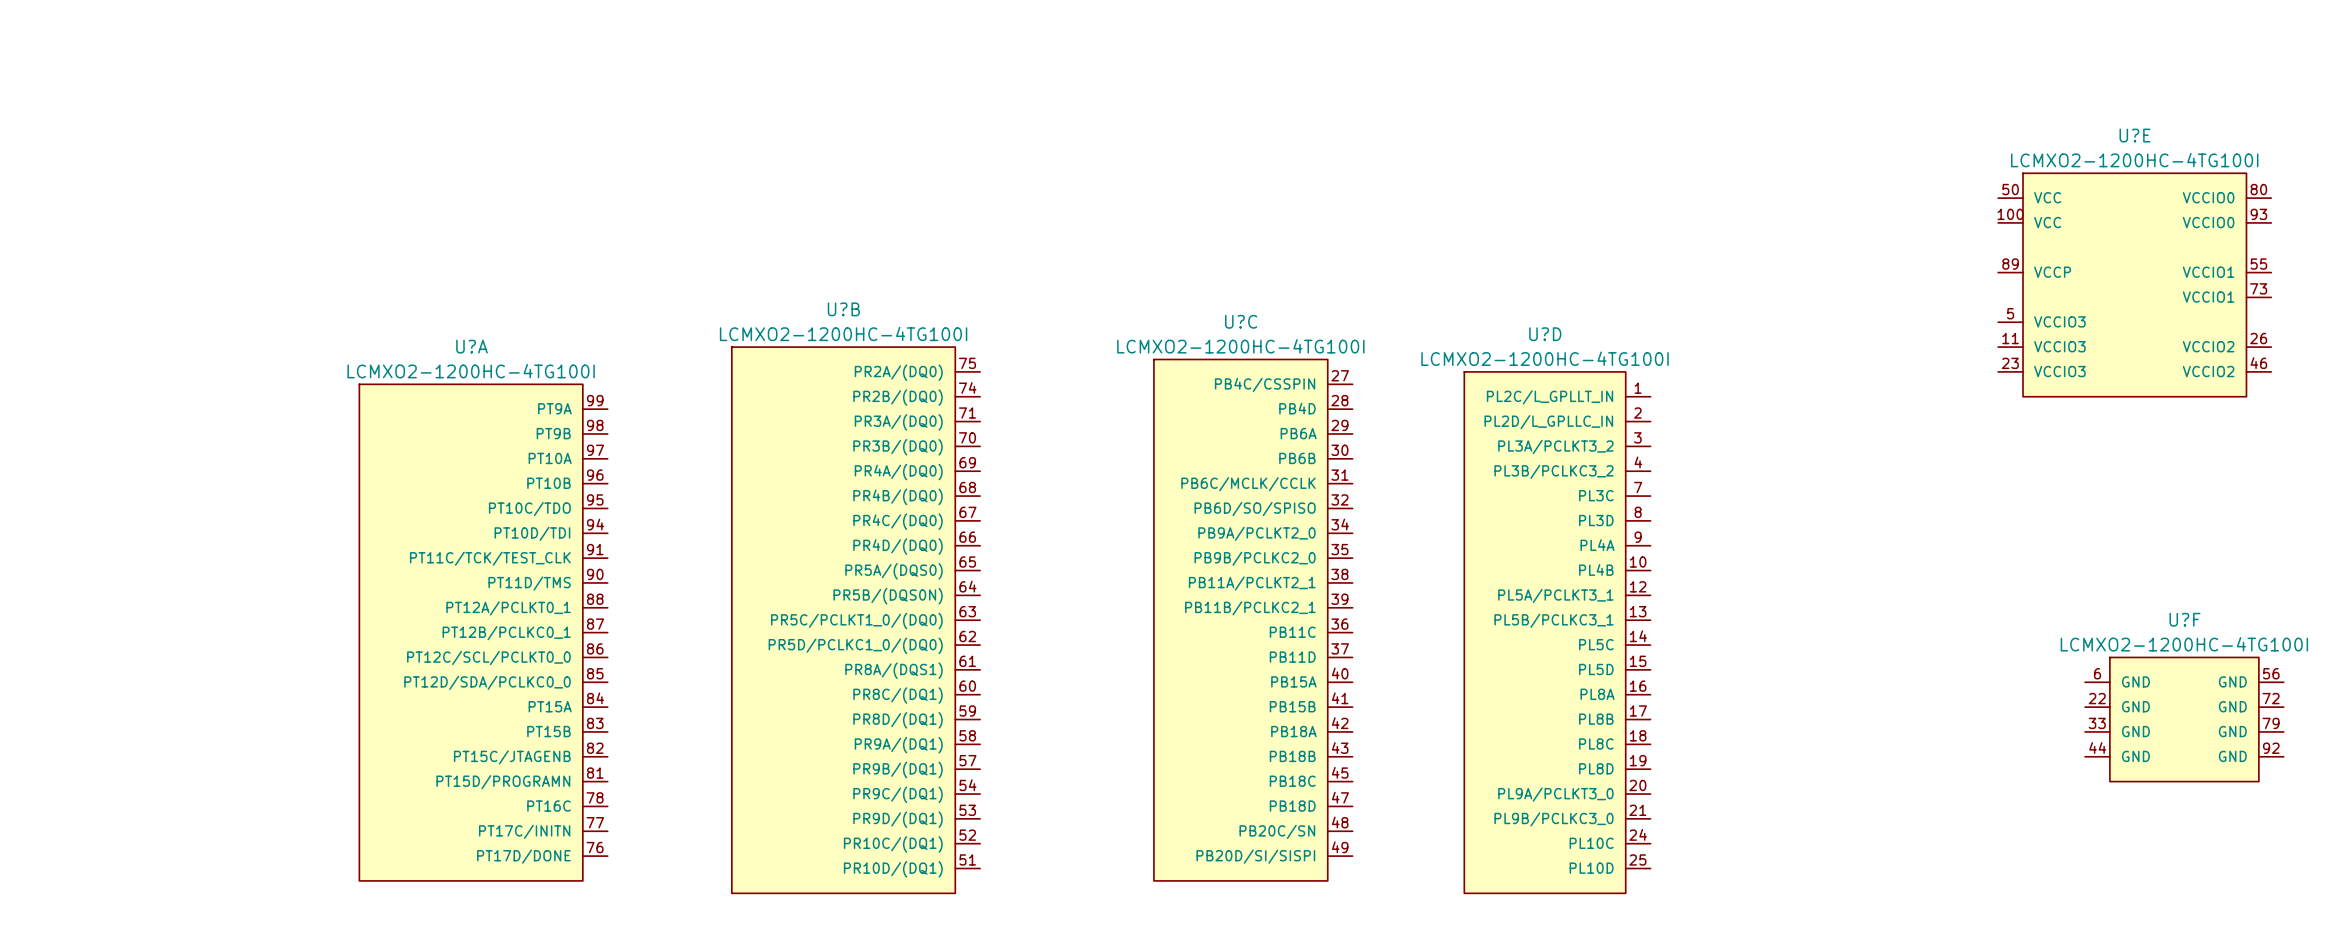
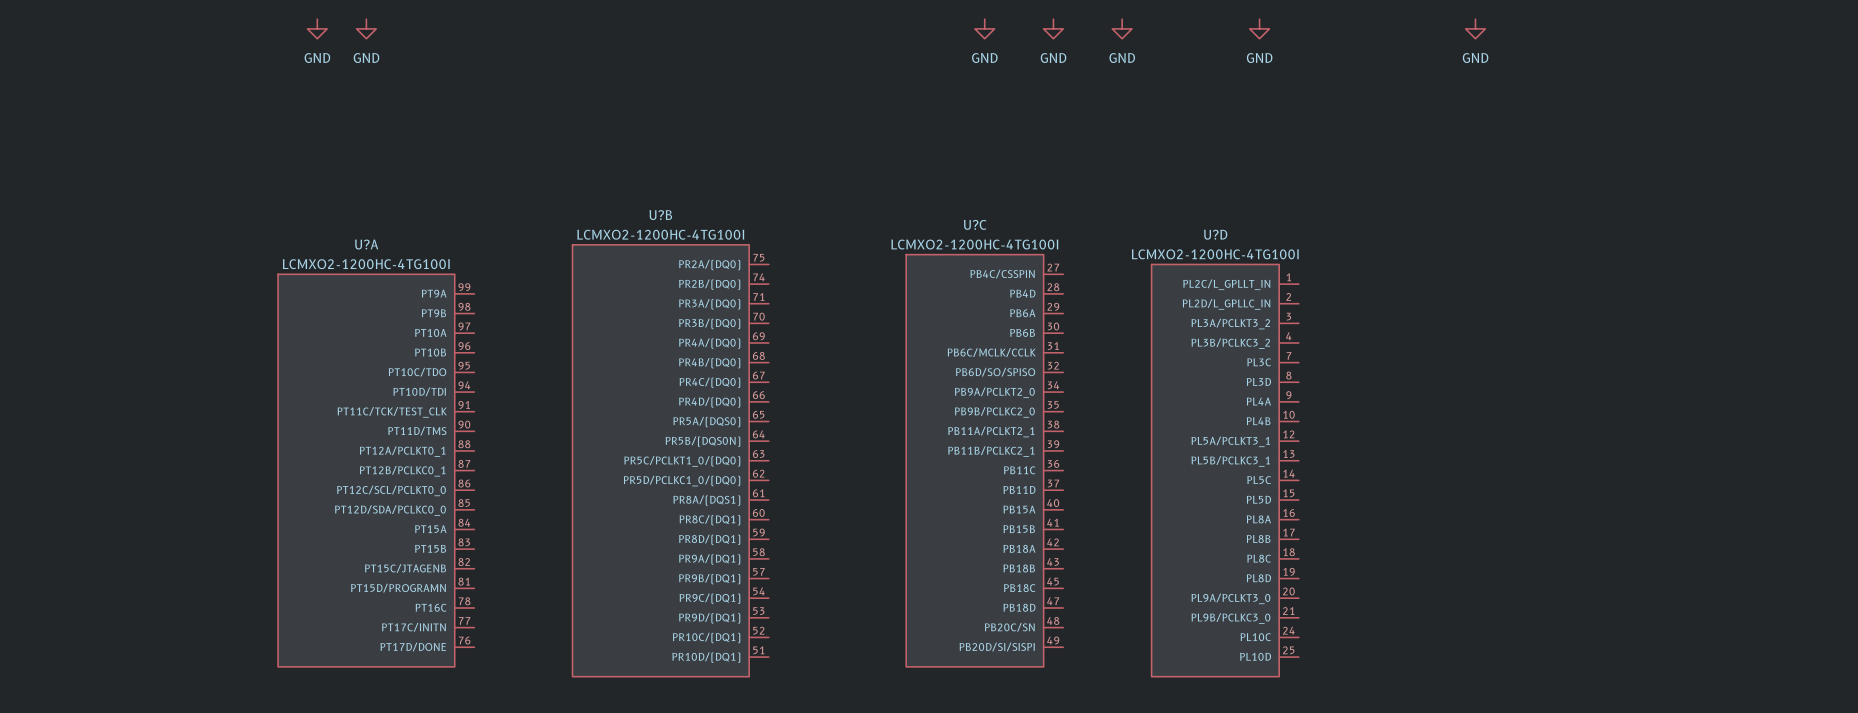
power symbol: none -> GND (317, 28)
power symbol: none -> GND (366, 28)
power symbol: none -> GND (984, 28)
power symbol: none -> GND (1053, 28)
power symbol: none -> GND (1122, 28)
power symbol: none -> GND (1259, 28)
power symbol: none -> GND (1475, 28)
U?E: LCMXO2-1200HC-4TG100I (2134, 285) -> none
U?F: LCMXO2-1200HC-4TG100I (2184, 719) -> none

